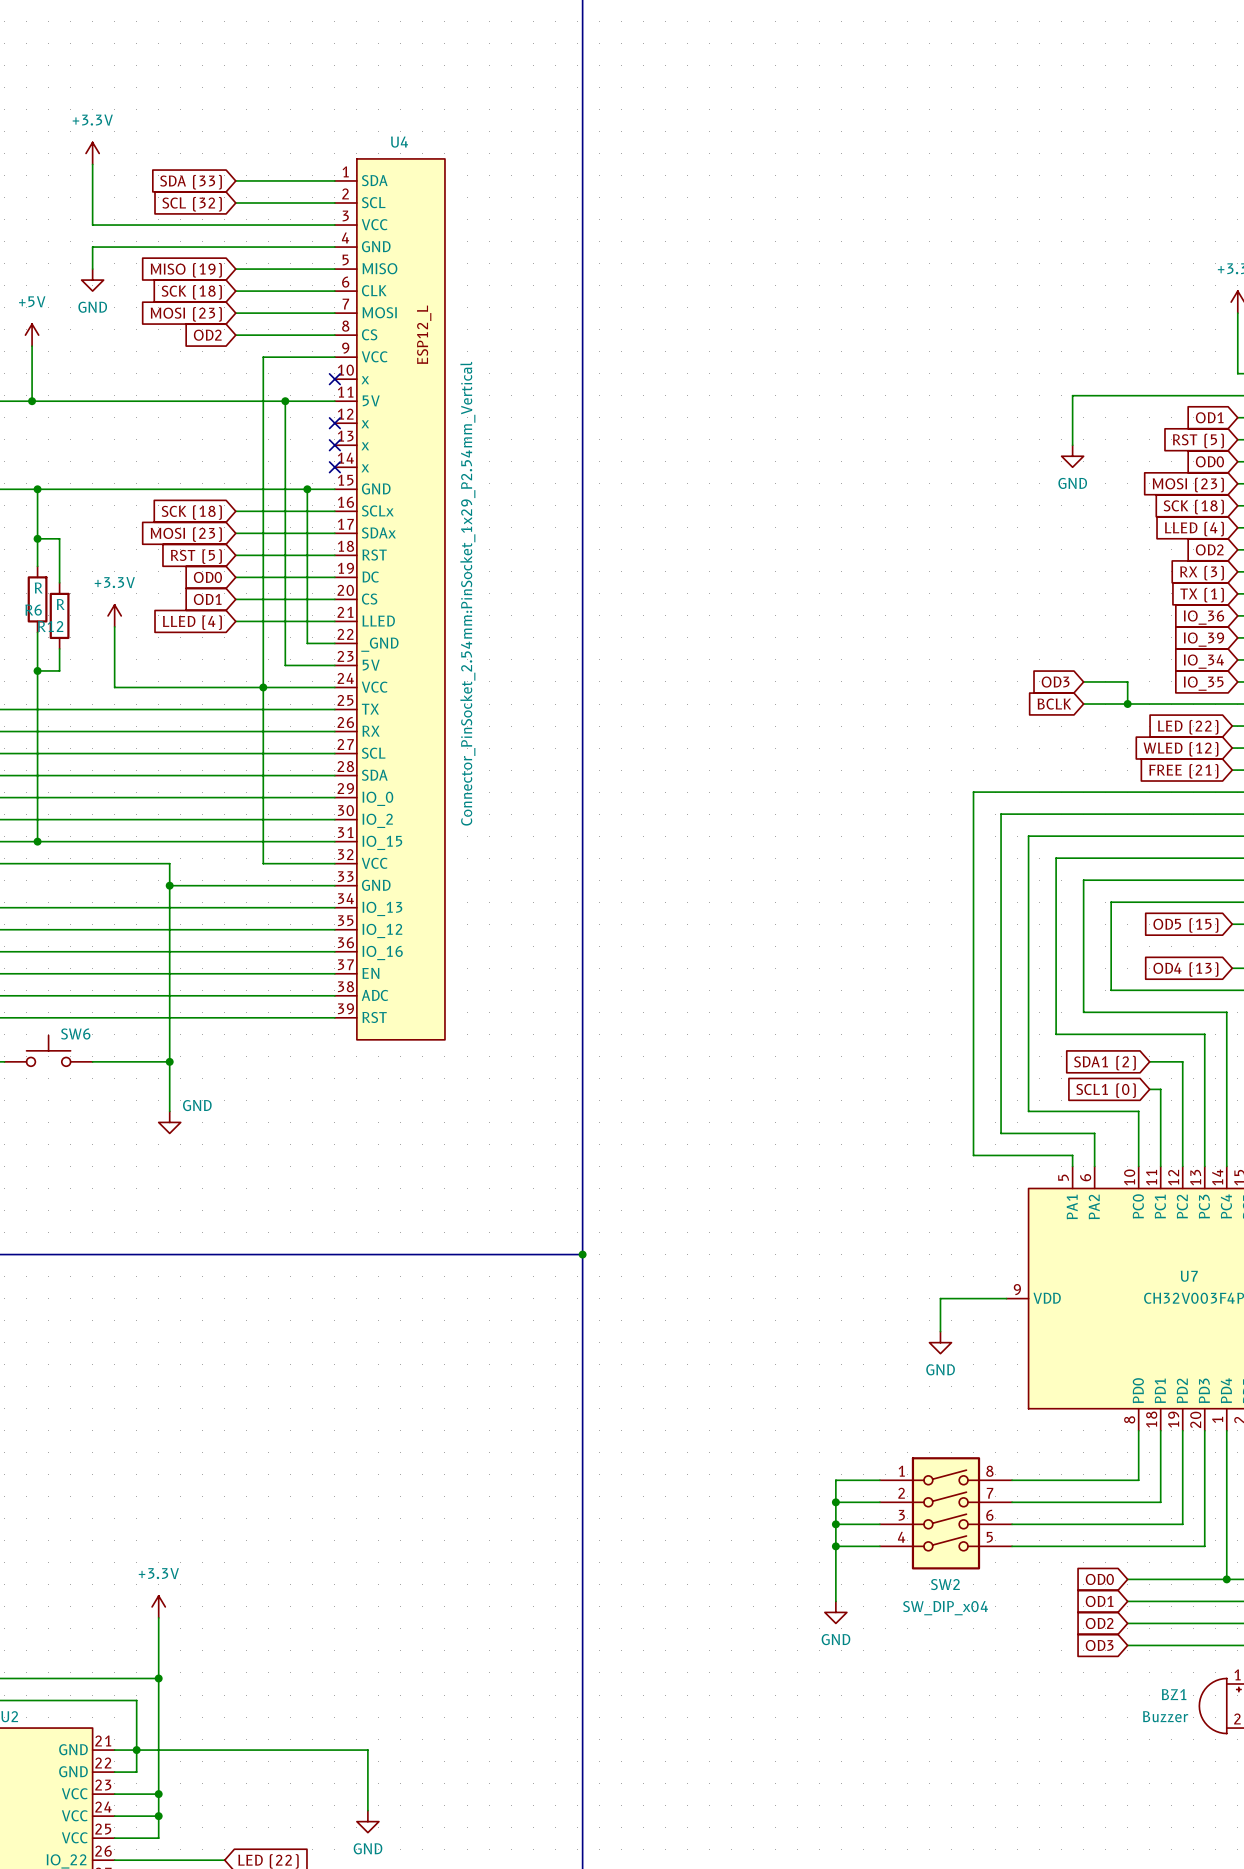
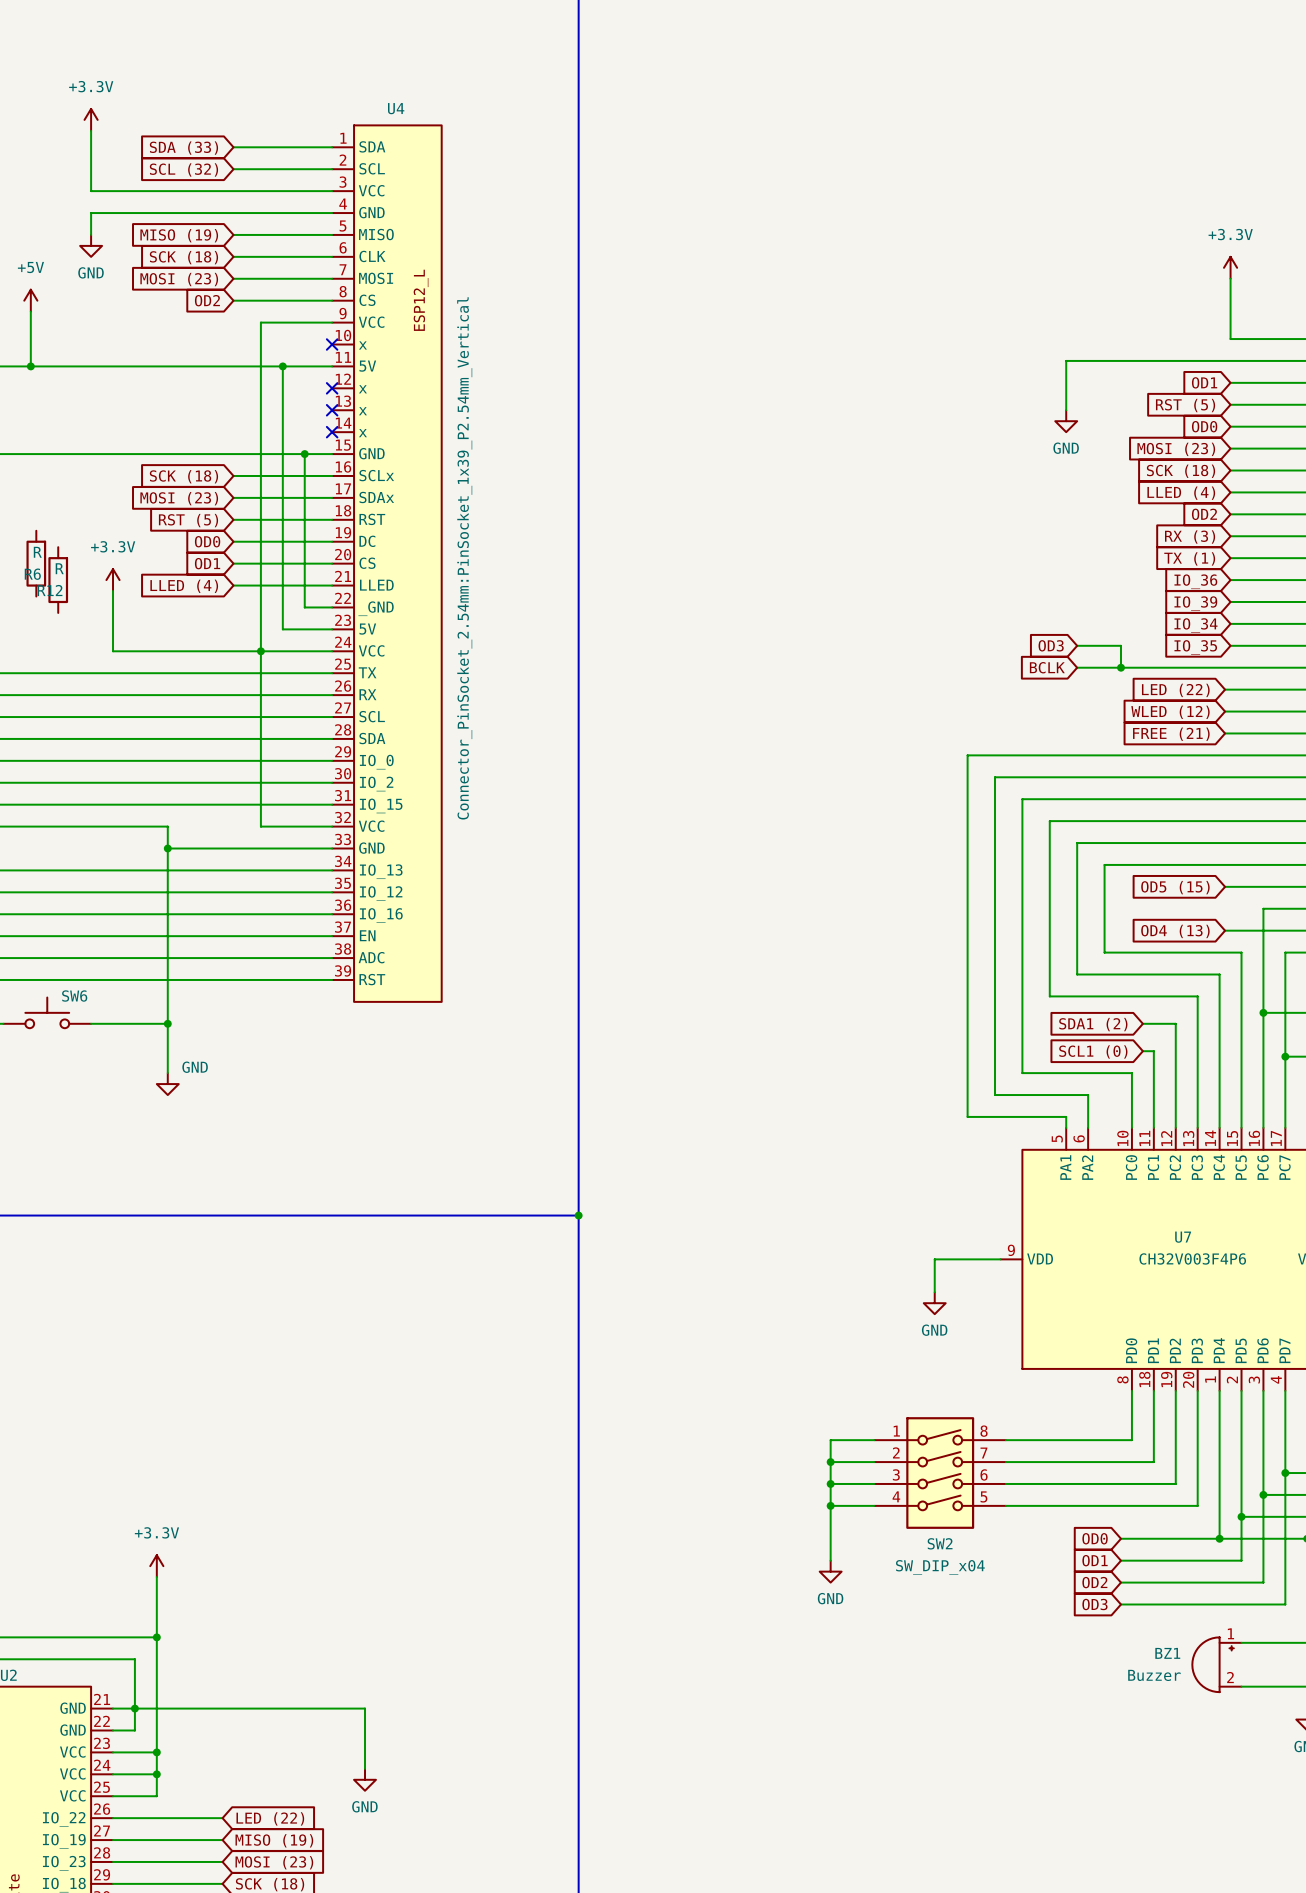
wire: (37, 489) (37, 566) -> none
junction: (37, 489) -> none
wire: (37, 538) (59, 538) (59, 582) -> none
junction: (37, 538) -> none
U4 text: Connector_PinSocket_2.54mm:PinSocket_1x29_P2.54mm_Vertical (467, 593) -> Connector_PinSocket_2.54mm:PinSocket_1x39_P2.54mm_Vertical (464, 558)
wire: (37, 632) (37, 841) -> none
wire: (59, 648) (59, 670) (37, 670) -> none
junction: (37, 670) -> none
junction: (37, 841) -> none

